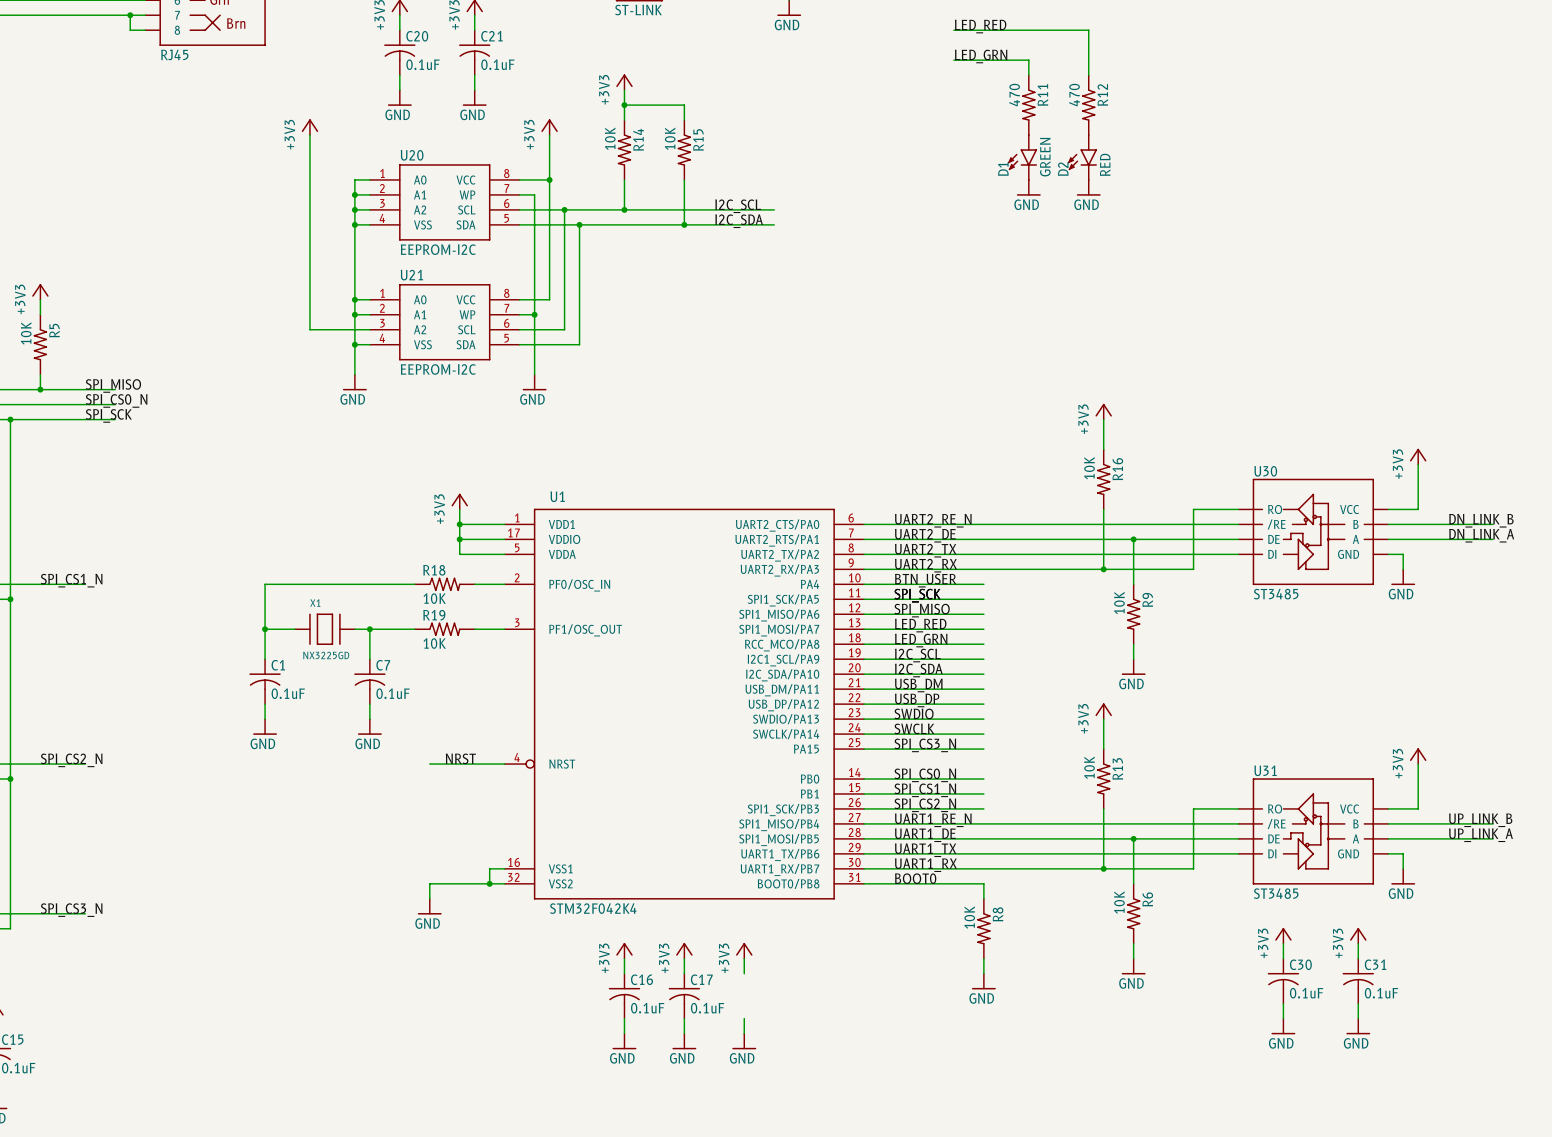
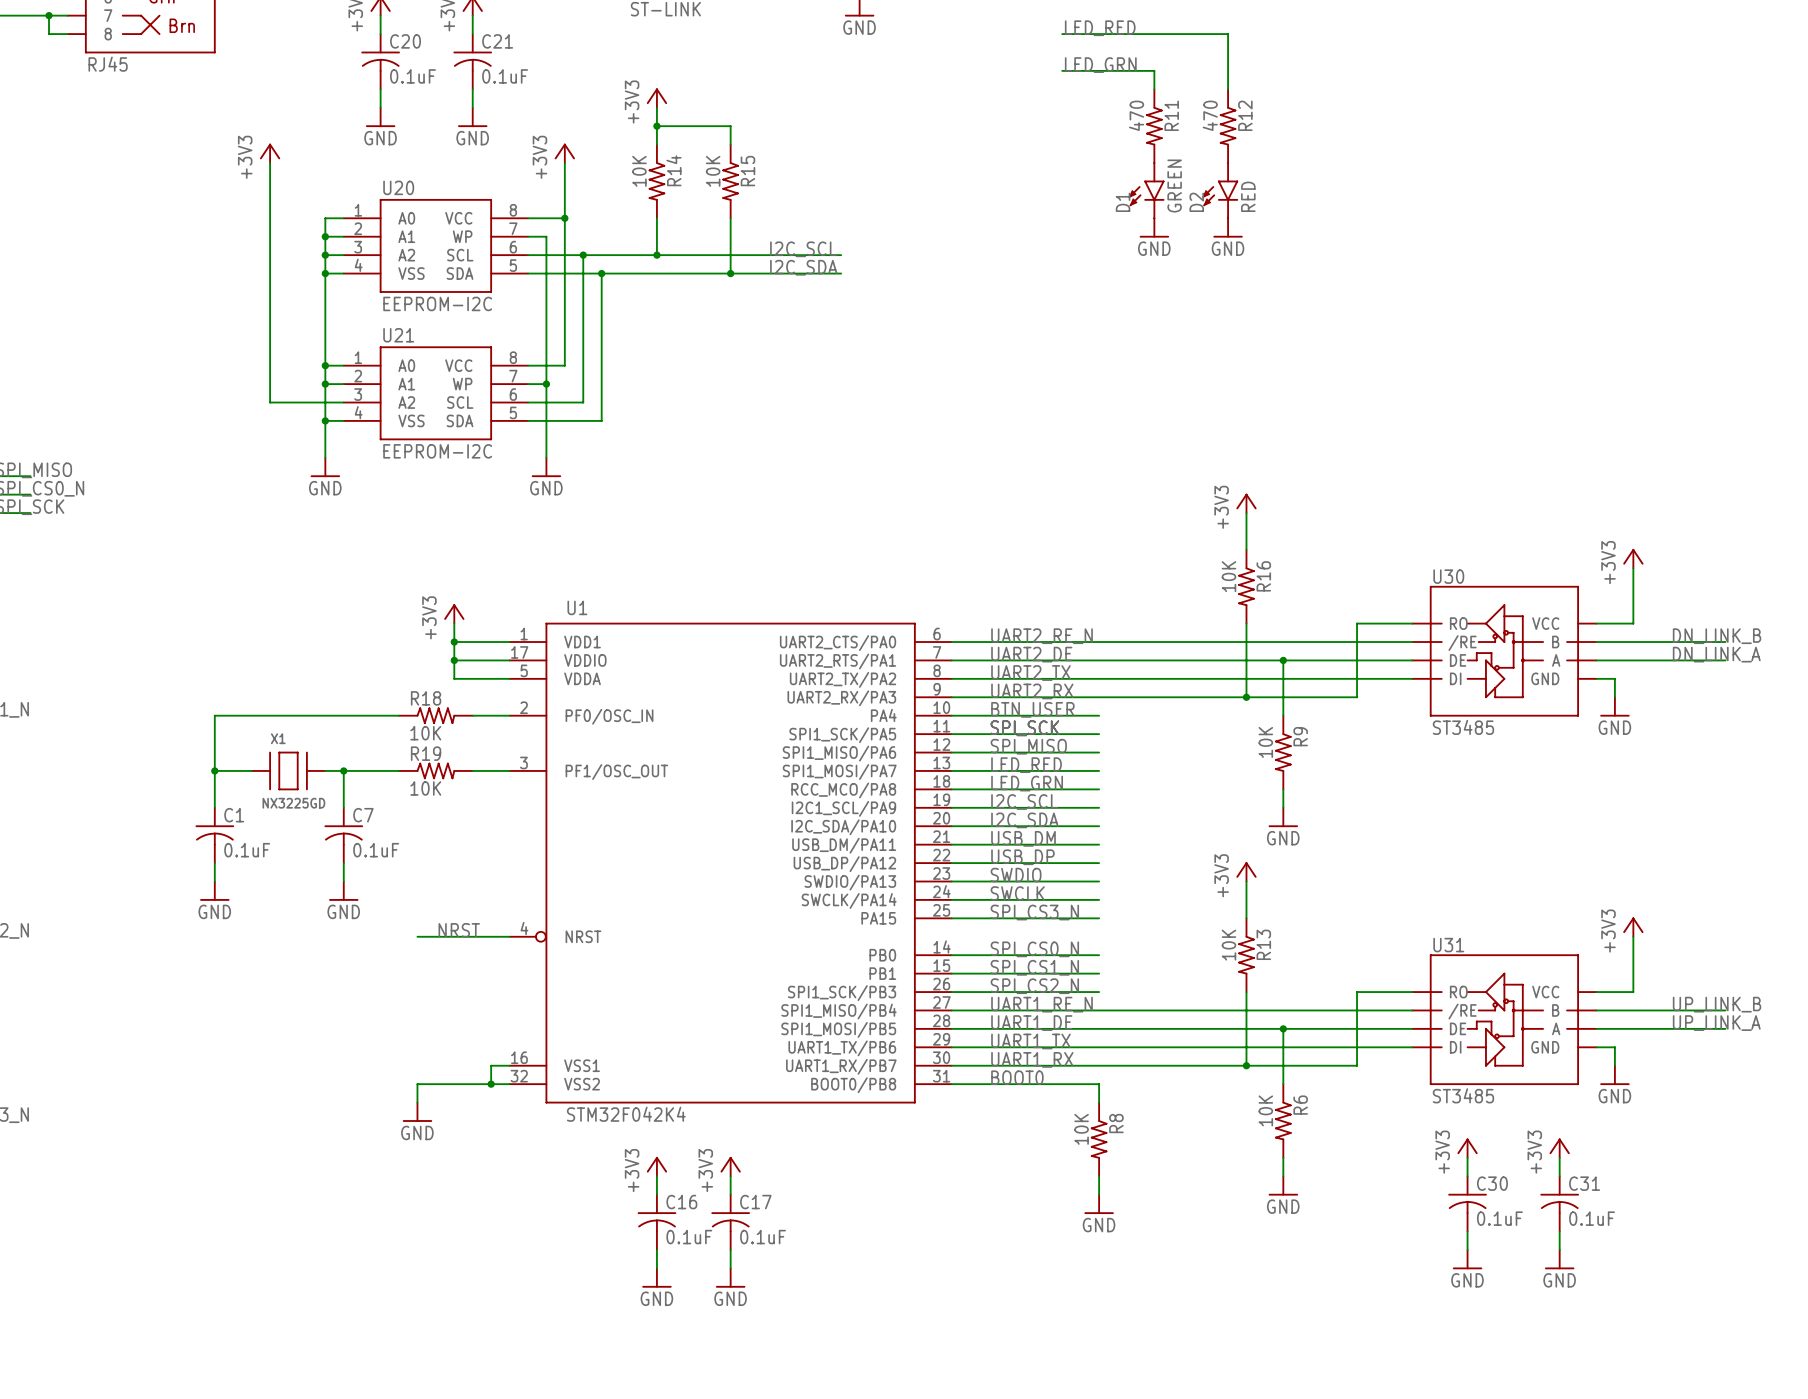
power symbol: +3V3 (744, 950) -> none
wire: (744, 958) (744, 973) -> none
wire: (744, 1018) (744, 1033) -> none
power symbol: GND (744, 1041) -> none

